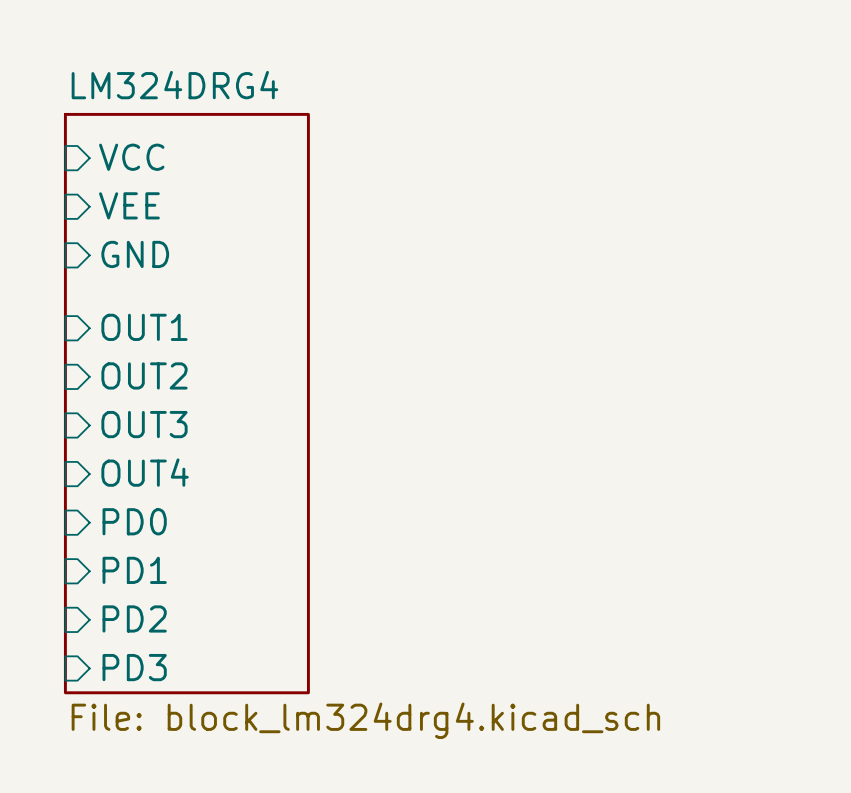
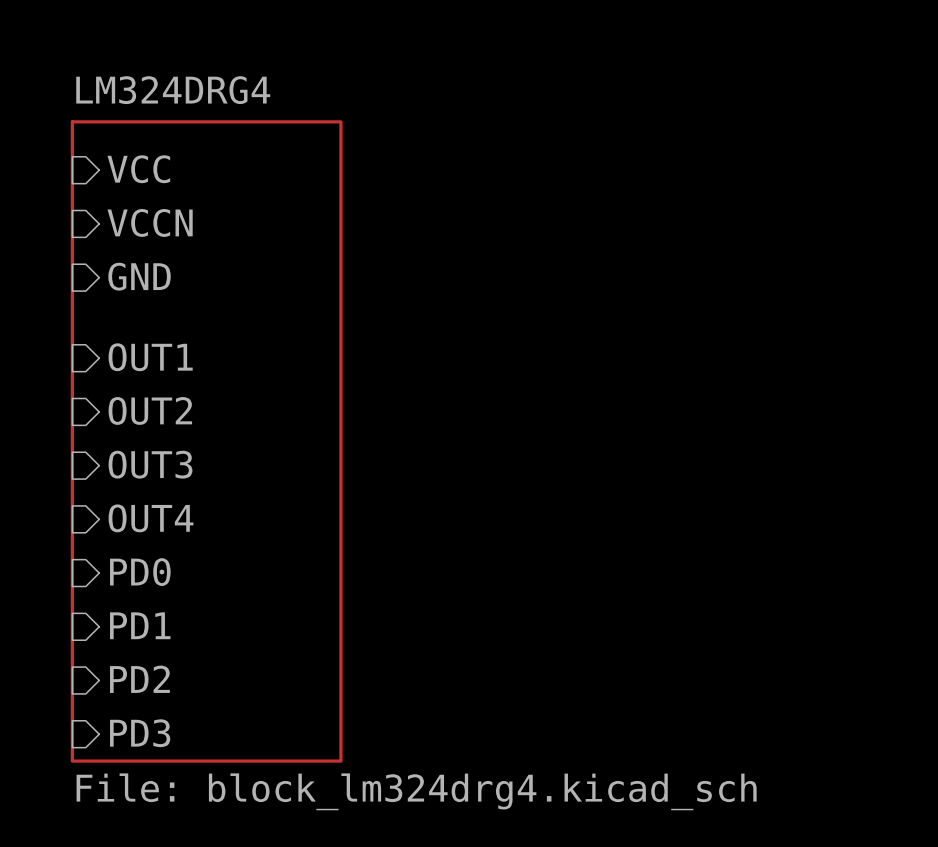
sheet pin: VEE (129, 205) -> VCCN (150, 222)

